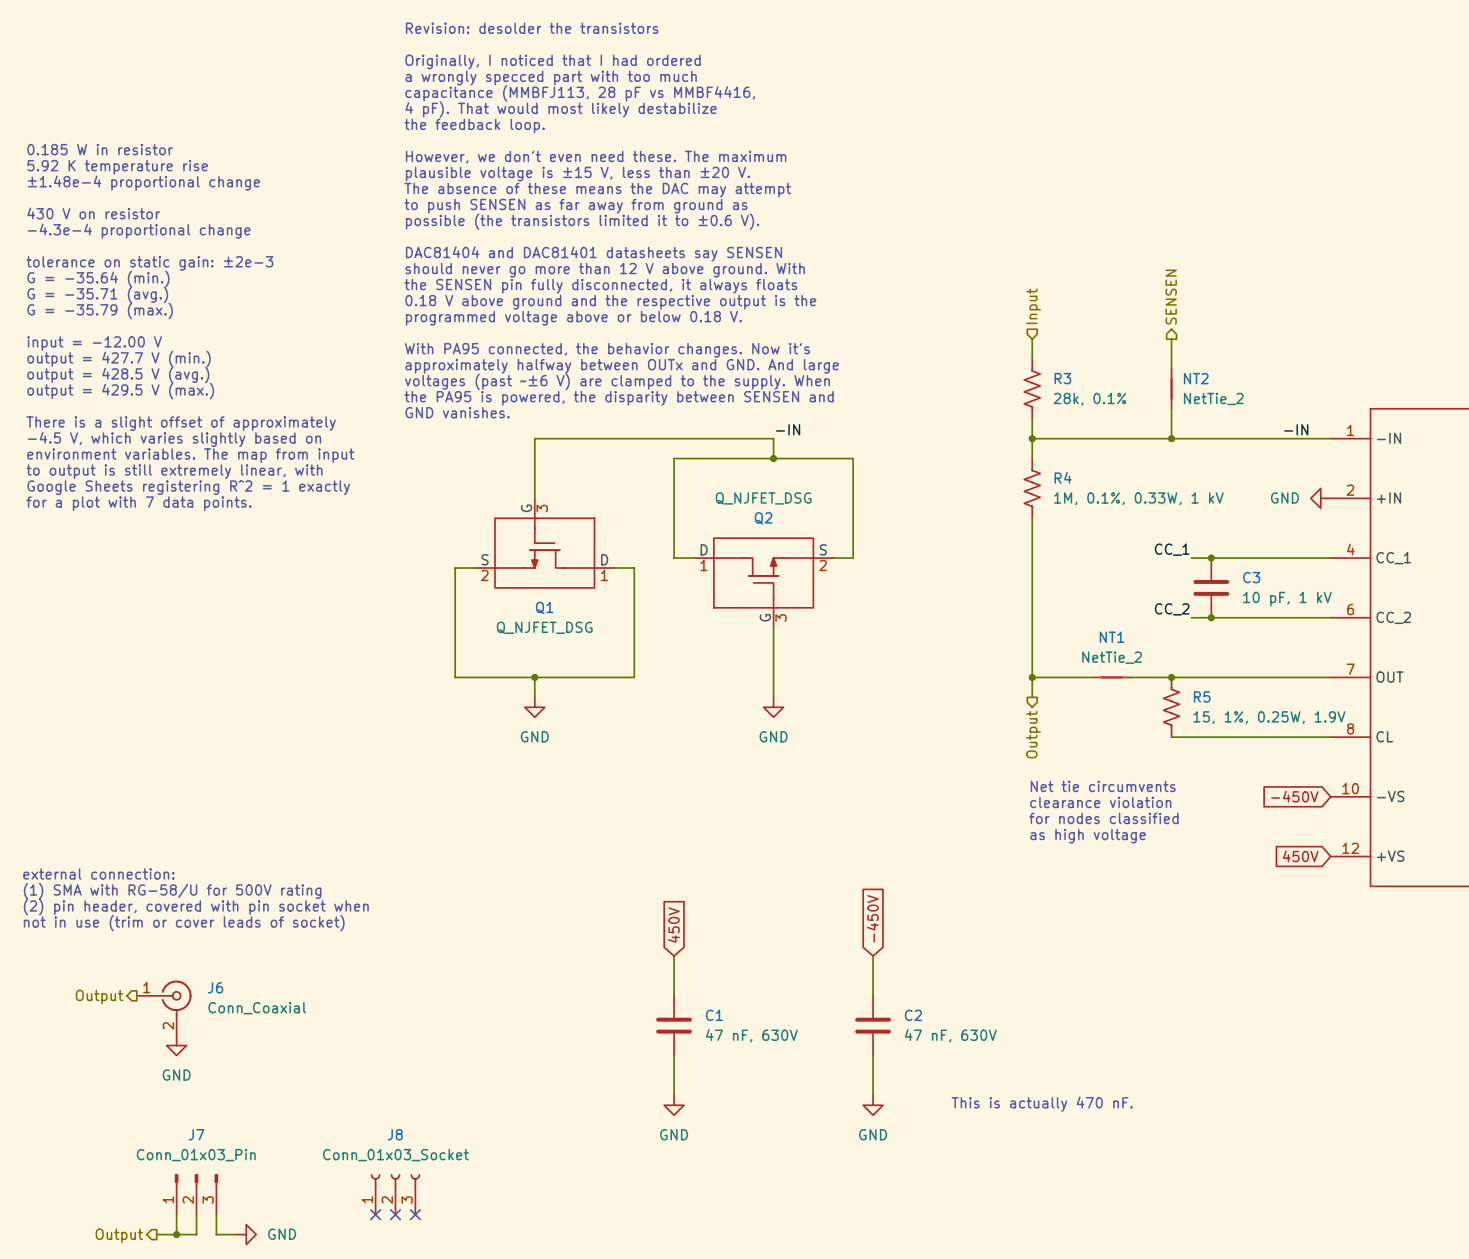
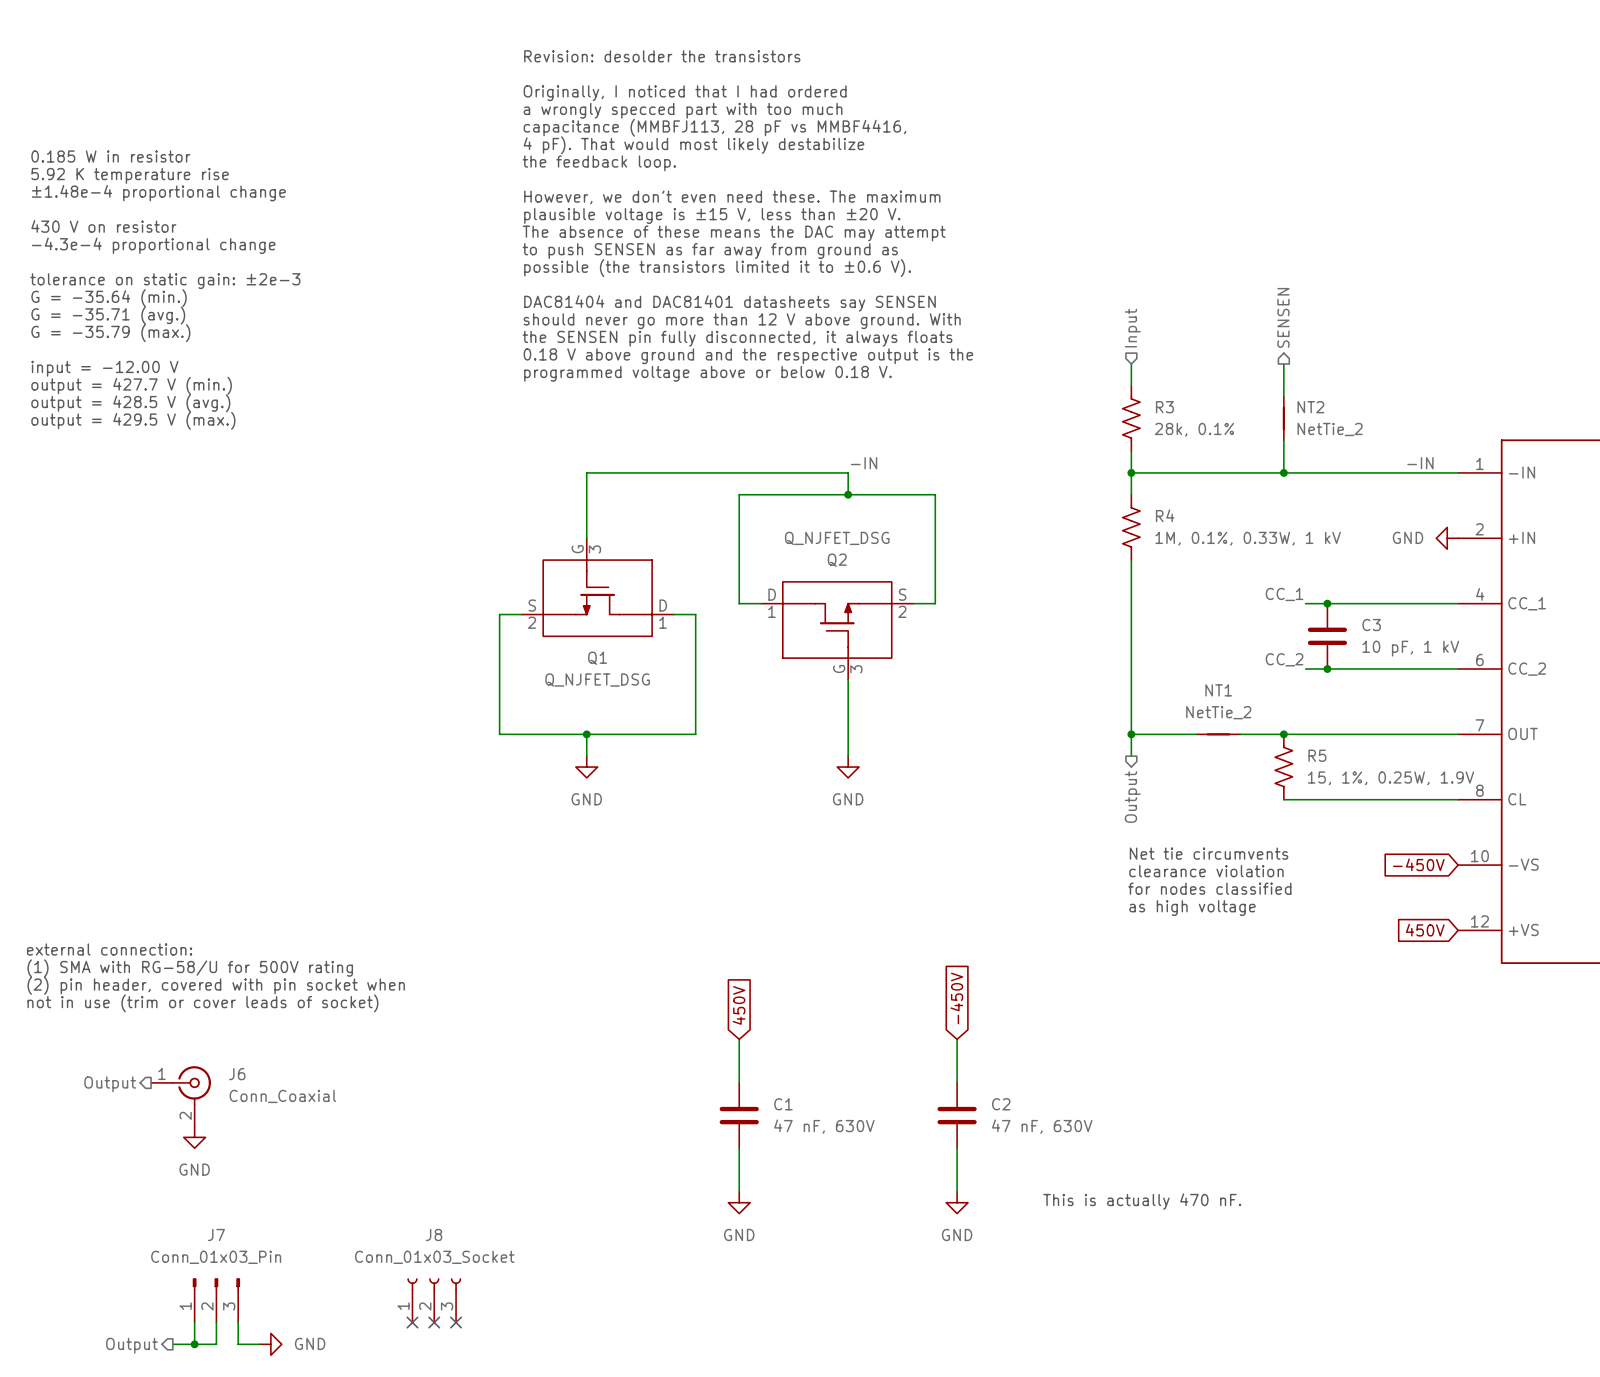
text position: Revision: desolder the transistors (532, 28) -> Revision: desolder the transistors (662, 56)
text position: Originally, I noticed that I had ordered (553, 61) -> Originally, I noticed that I had ordered (685, 93)
text position: a wrongly specced part with too much (551, 77) -> a wrongly specced part with too much (683, 110)
text position: capacitance (MMBFJ113, 28 pF vs MMBF4416, (580, 93) -> capacitance (MMBFJ113, 28 pF vs MMBF4416, (714, 127)
text position: 4 pF). That would most likely destabilize (561, 109) -> 4 pF). That would most likely destabilize (693, 145)
text position: the feedback loop. (474, 126) -> the feedback loop. (599, 163)
text position: However, we don't even need these. The maximum (596, 157) -> However, we don't even need these. The maximum (732, 197)
text position: plausible voltage is ±15 V, less than ±20 V. (577, 174) -> plausible voltage is ±15 V, less than ±20 V. (712, 215)
text position: The absence of these means the DAC may attempt (597, 190) -> The absence of these means the DAC may attempt (734, 233)
text position: to push SENSEN as far away from ground as (575, 206) -> to push SENSEN as far away from ground as (710, 251)
text position: possible (the transistors limited it to ±0.6 V). (582, 221) -> possible (the transistors limited it to ±0.6 V). (717, 268)
text position: DAC81404 and DAC81401 datasheets say SENSEN (593, 253) -> DAC81404 and DAC81401 datasheets say SENSEN (729, 303)
text position: should never go more than 12 V above ground. With (605, 270) -> should never go more than 12 V above ground. With (742, 321)
text position: the SENSEN pin fully disconnected, it always floats (600, 286) -> the SENSEN pin fully disconnected, it always floats (737, 338)
text position: 0.18 V above ground and the respective output is the (610, 302) -> 0.18 V above ground and the respective output is the (748, 356)
text position: programmed voltage above or below 0.18 V. (573, 318) -> programmed voltage above or below 0.18 V. (707, 373)
text: With PA95 connected, the behavior changes. Now it's (607, 350) -> none
text: approximately halfway between OUTx and GND. And large (622, 366) -> none
text: voltages (past ~±6 V) are clamped to the supply. When (617, 381) -> none
text: the PA95 is powered, the disparity between SENSEN and (619, 398) -> none
text: GND vanishes. (457, 412) -> none
text: There is a slight offset of approximately (181, 423) -> none
text: -4.5 V, which varies slightly based on (174, 439) -> none
text: environment variables. The map from input (190, 455) -> none
text: to output is still extremely linear, with (174, 471) -> none
text: Google Sheets registering R^2 = 1 exactly (188, 487) -> none
text: for a plot with 7 data points. (138, 503) -> none

